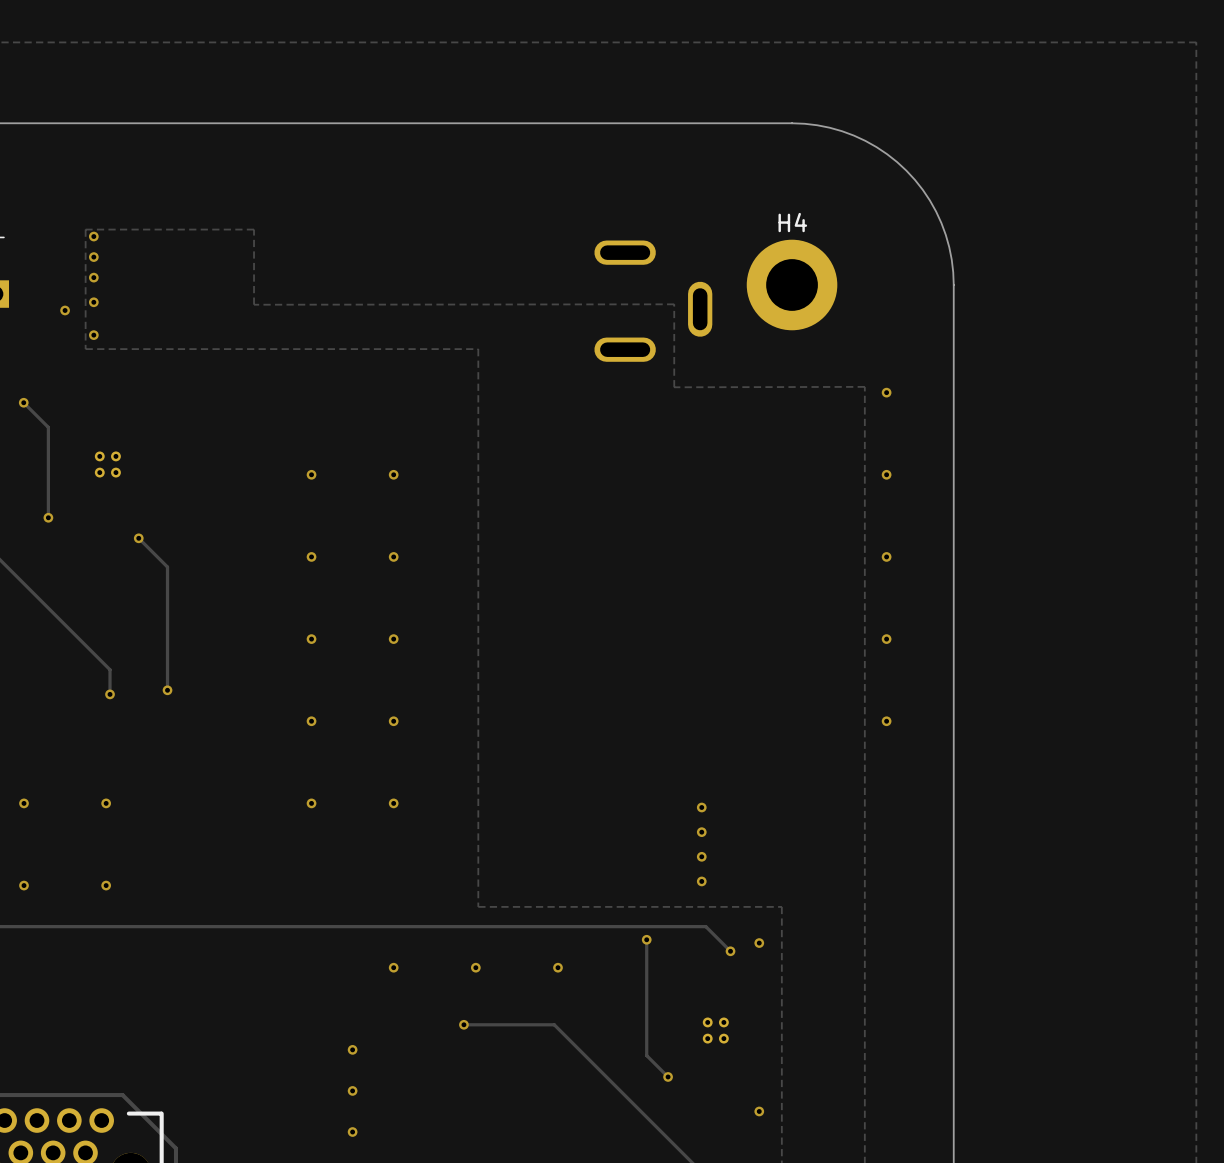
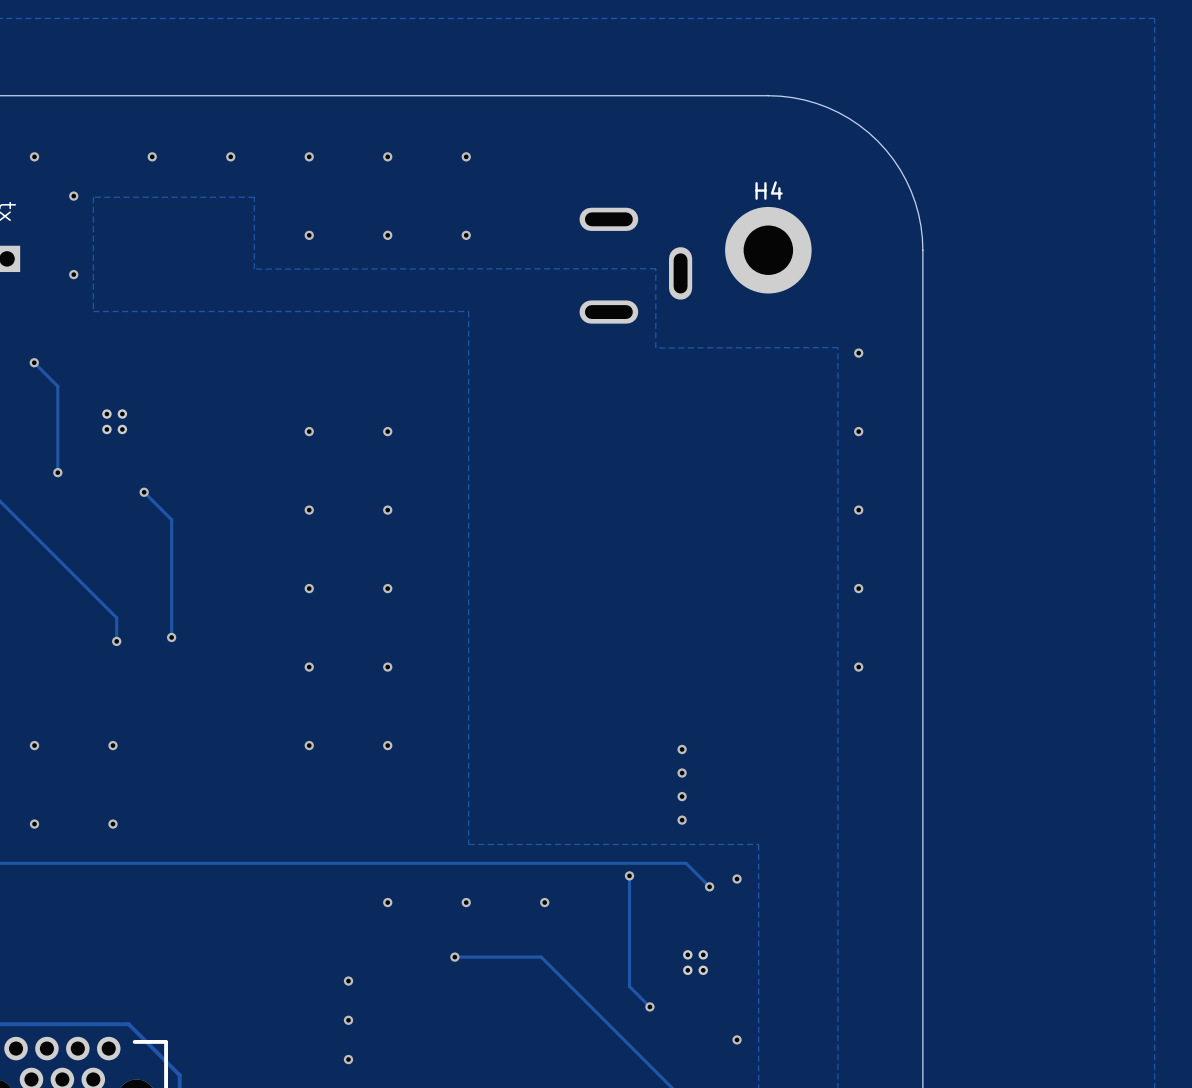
via: none -> (34, 156)
via: none -> (152, 156)
via: none -> (230, 156)
via: none -> (309, 156)
via: none -> (387, 156)
via: none -> (466, 156)
via: none -> (73, 196)
via: (93, 236) -> none
via: (93, 257) -> none
via: none -> (309, 235)
via: none -> (387, 235)
via: none -> (466, 235)
via: (93, 277) -> none
via: (93, 302) -> none
via: (93, 335) -> none

